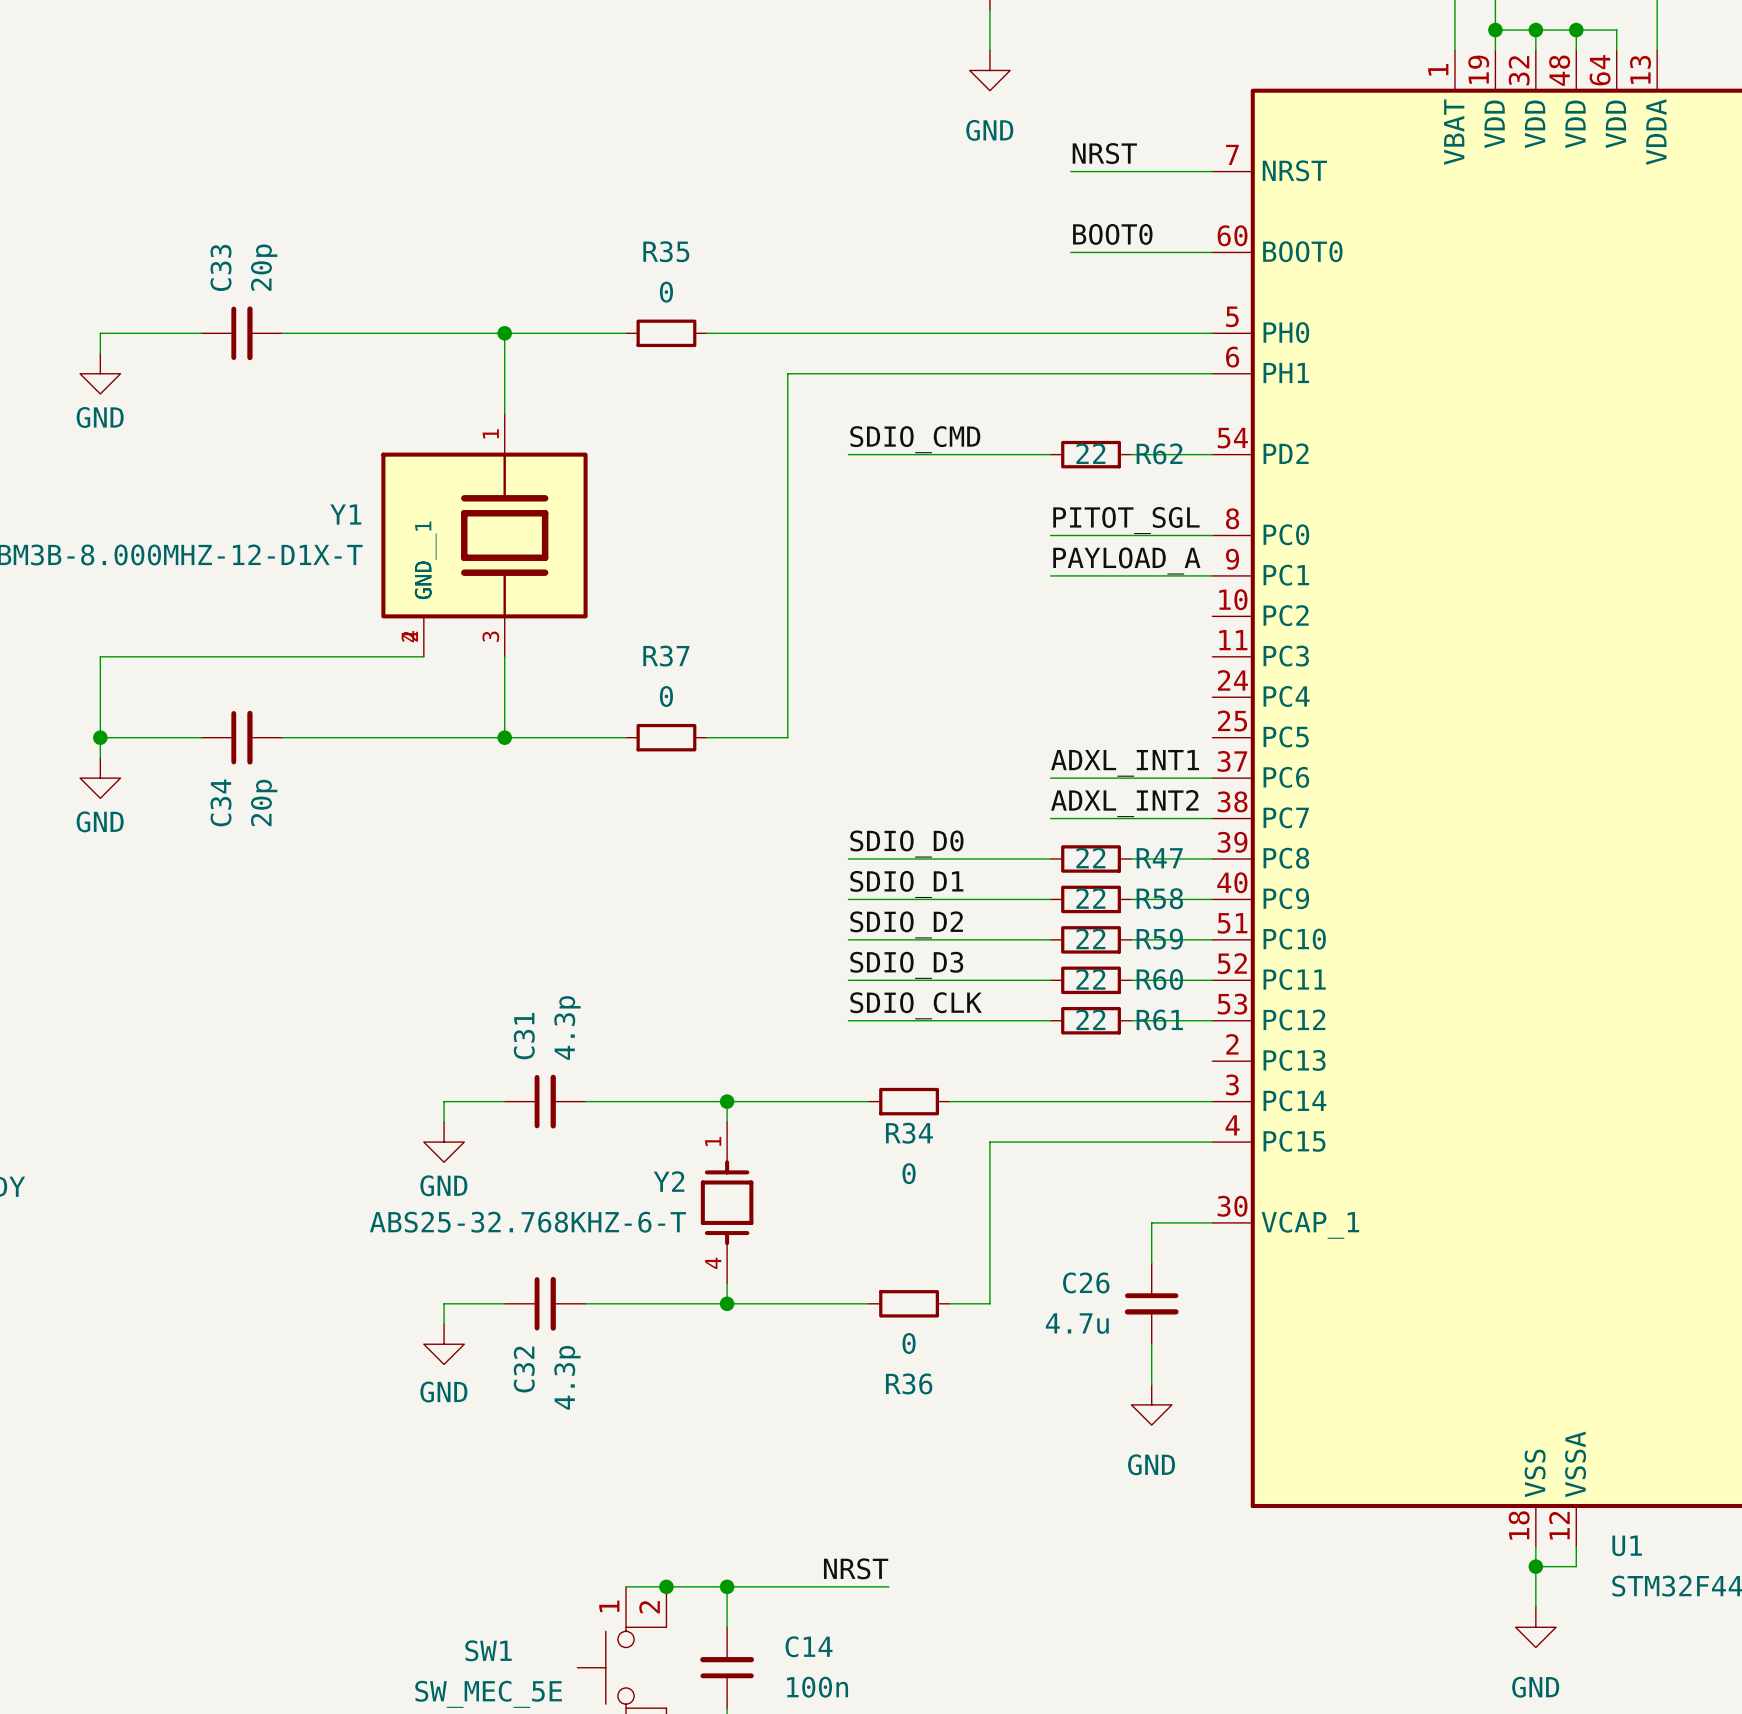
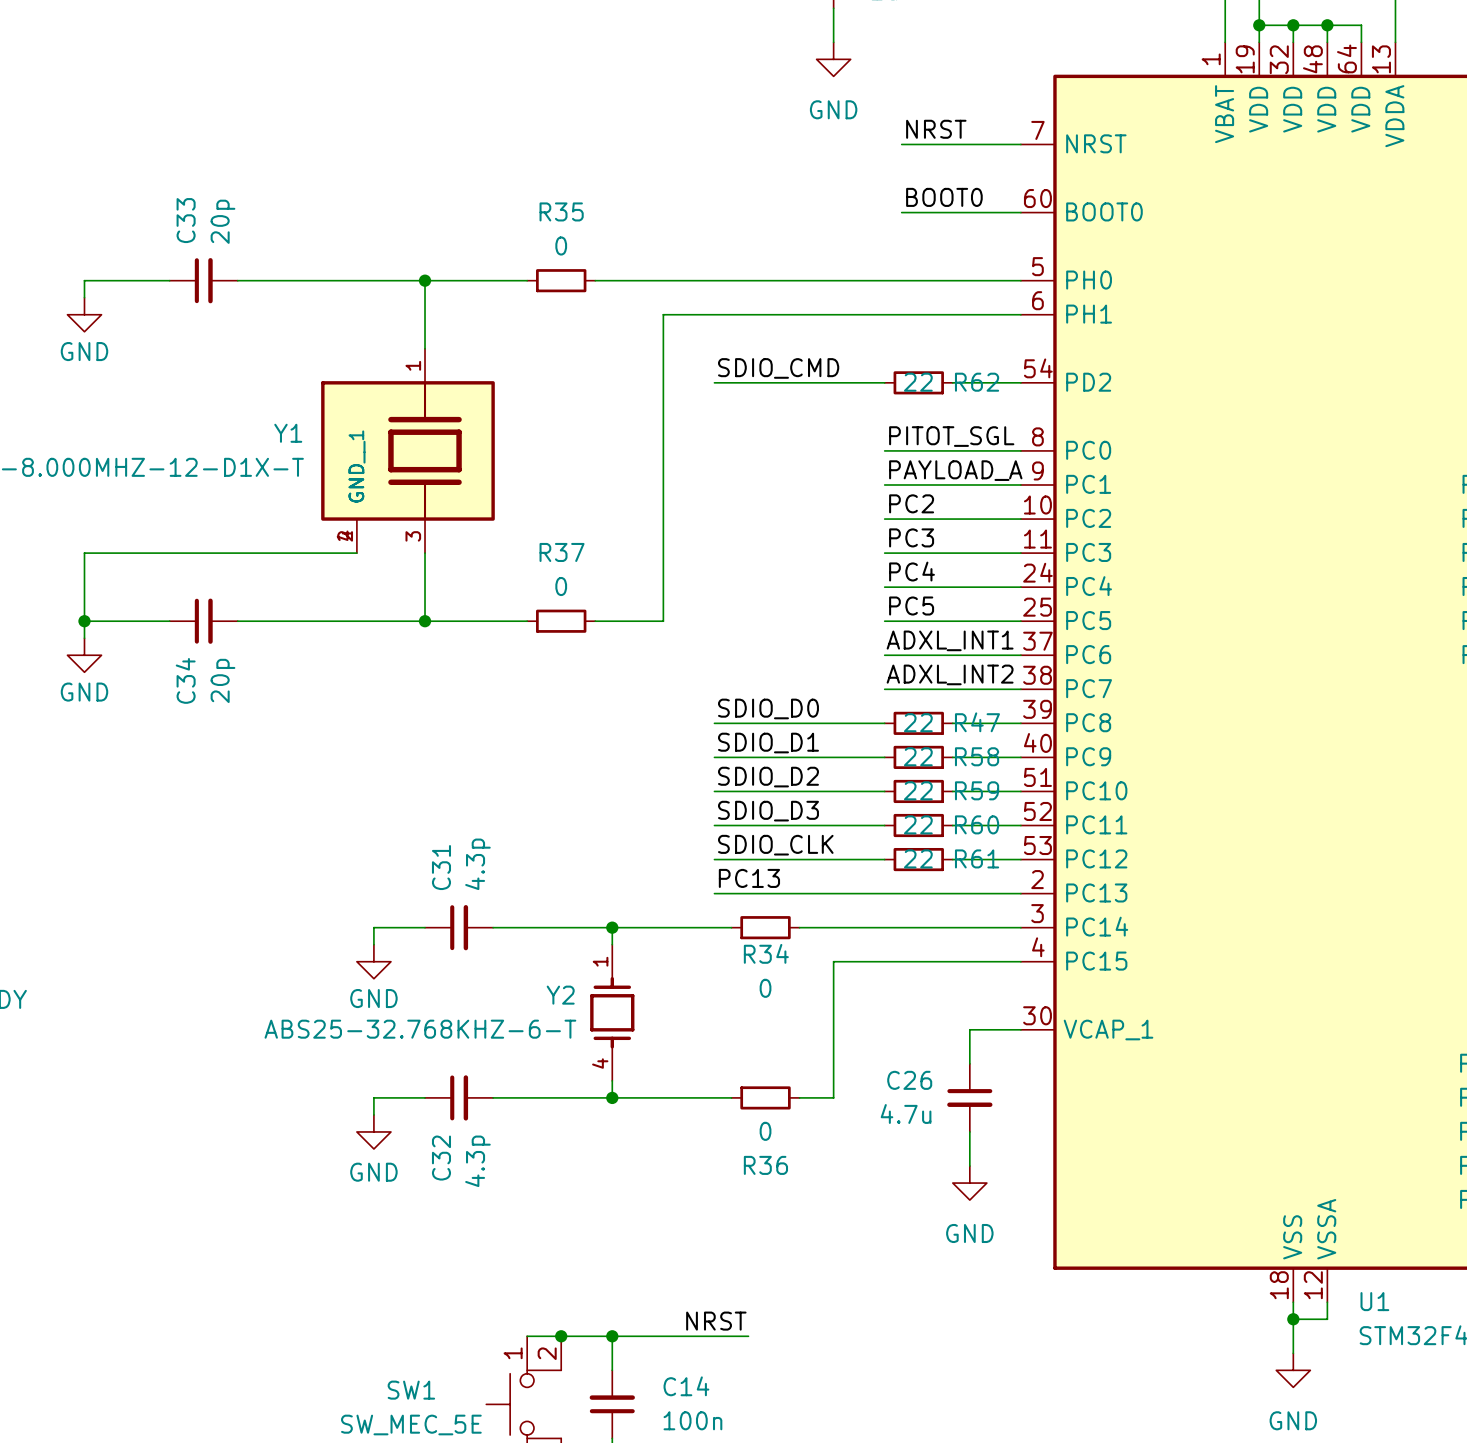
label: none -> PC2 (911, 503)
wire: none -> (884, 519) (1020, 519)
label: none -> PC3 (911, 537)
wire: none -> (884, 553) (1020, 553)
label: none -> PC4 (911, 571)
wire: none -> (884, 587) (1020, 587)
label: none -> PC5 (911, 606)
wire: none -> (884, 621) (1020, 621)
label: none -> PC13 (749, 878)
wire: none -> (714, 893) (1020, 893)

